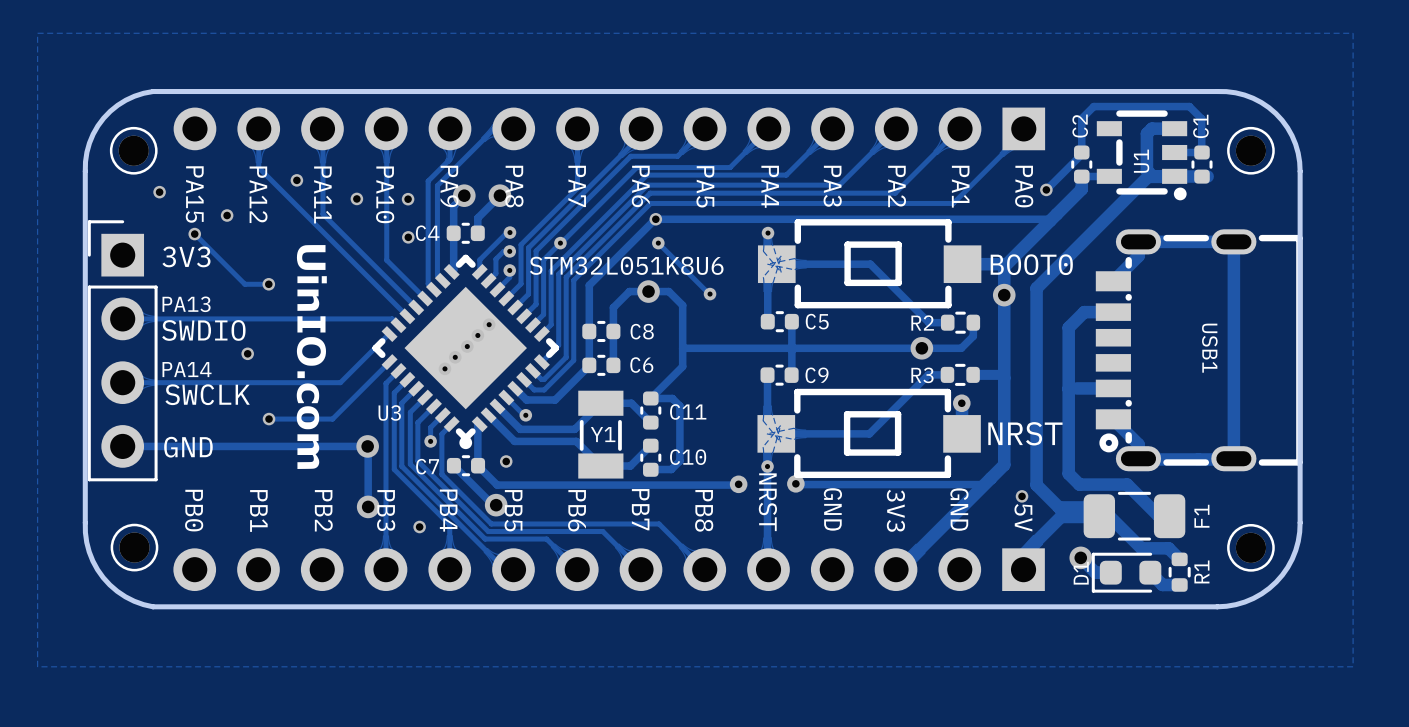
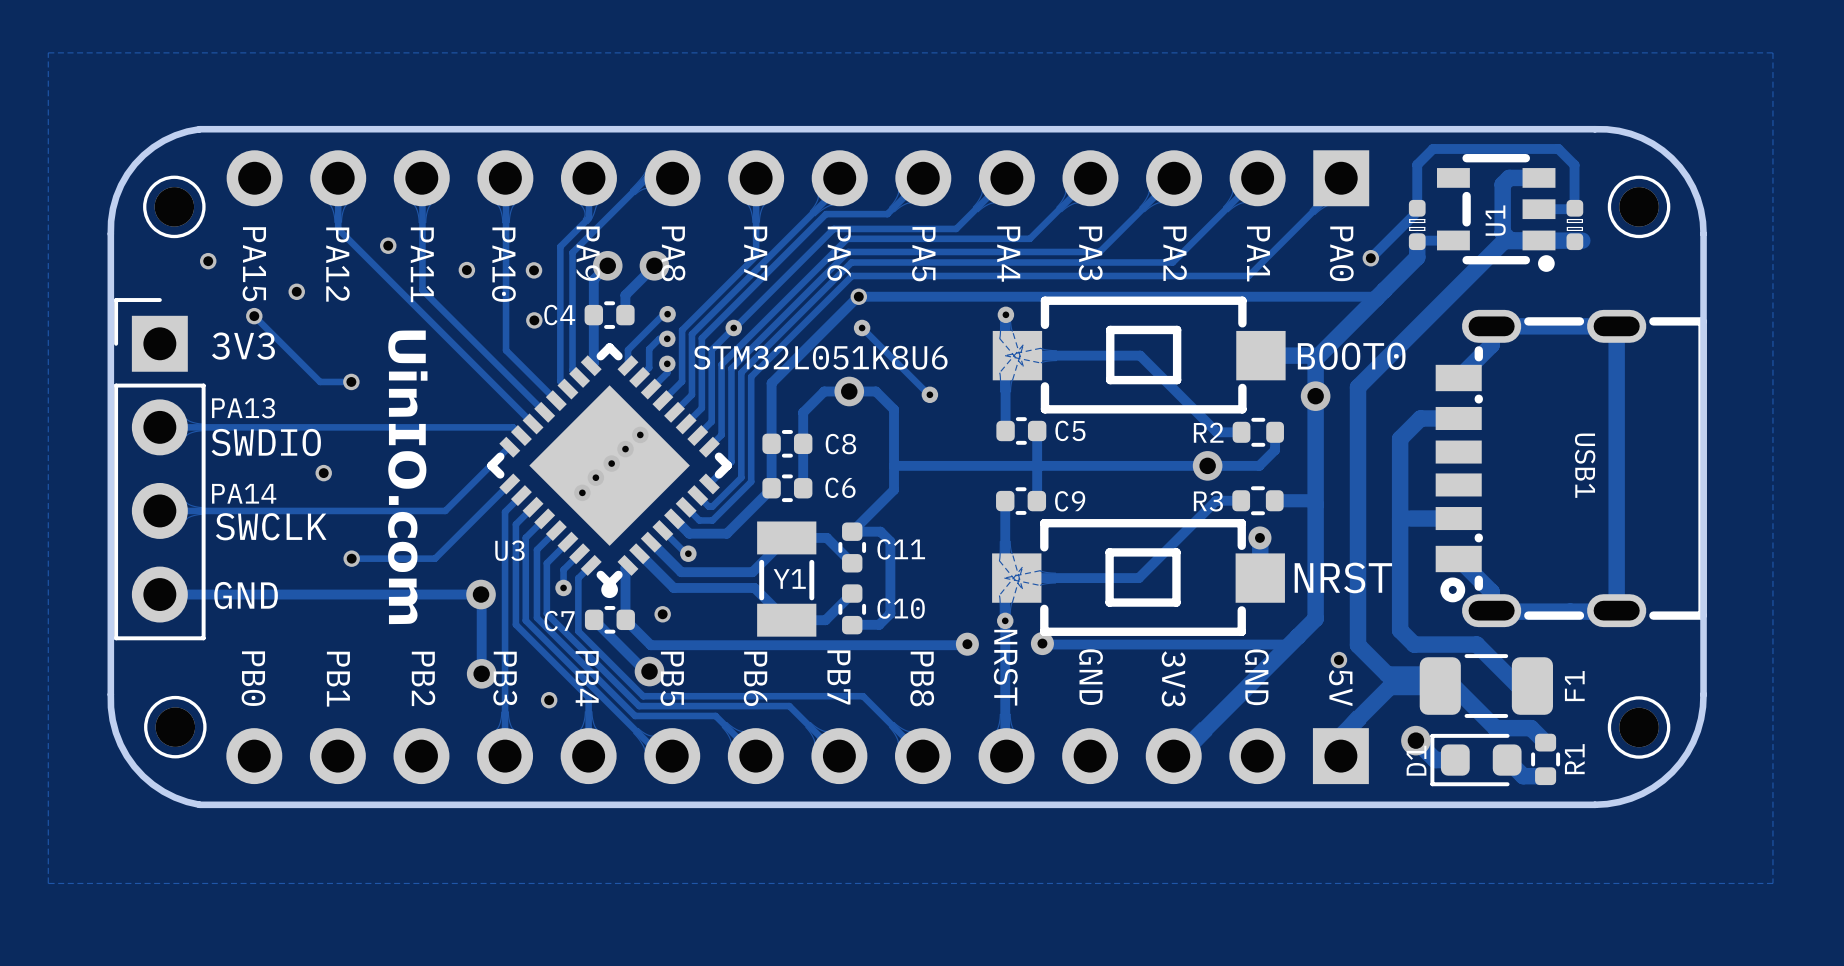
C2: (1081, 164) -> none
part: none -> (1417, 224)
C1: (1201, 164) -> none
part: none -> (1574, 224)

